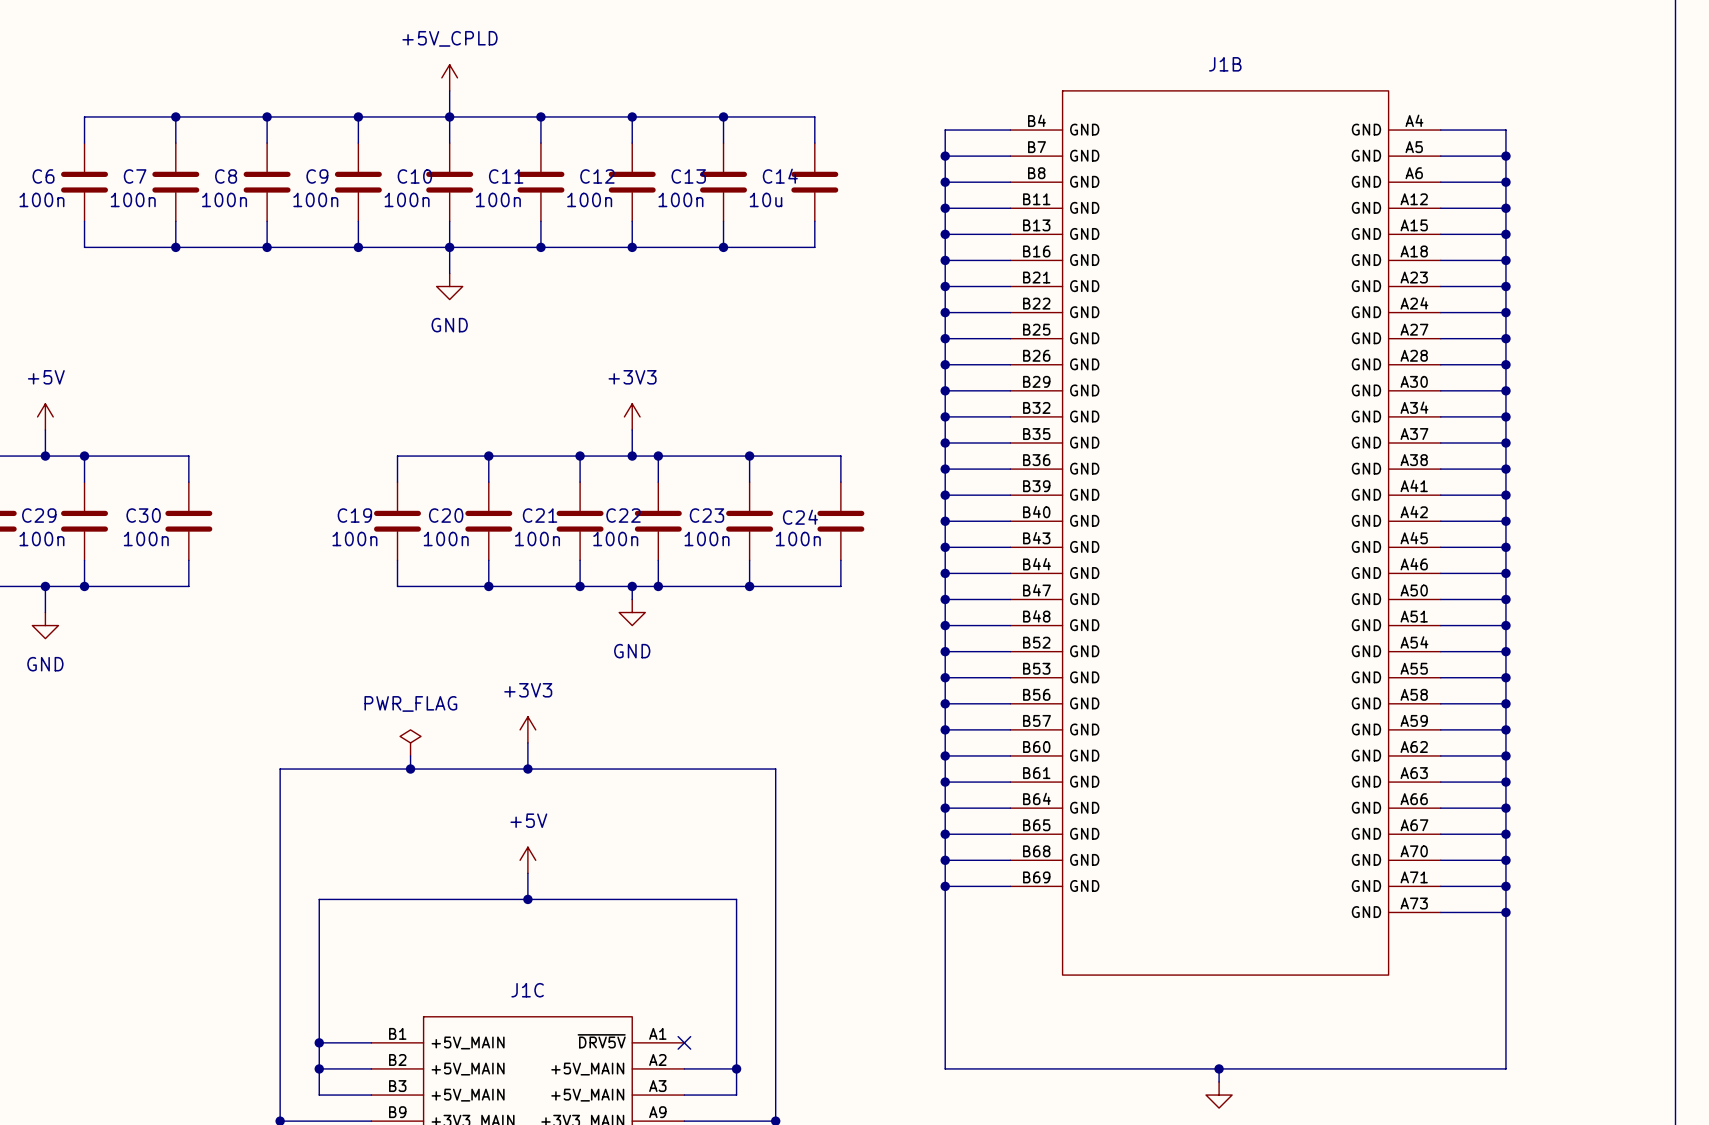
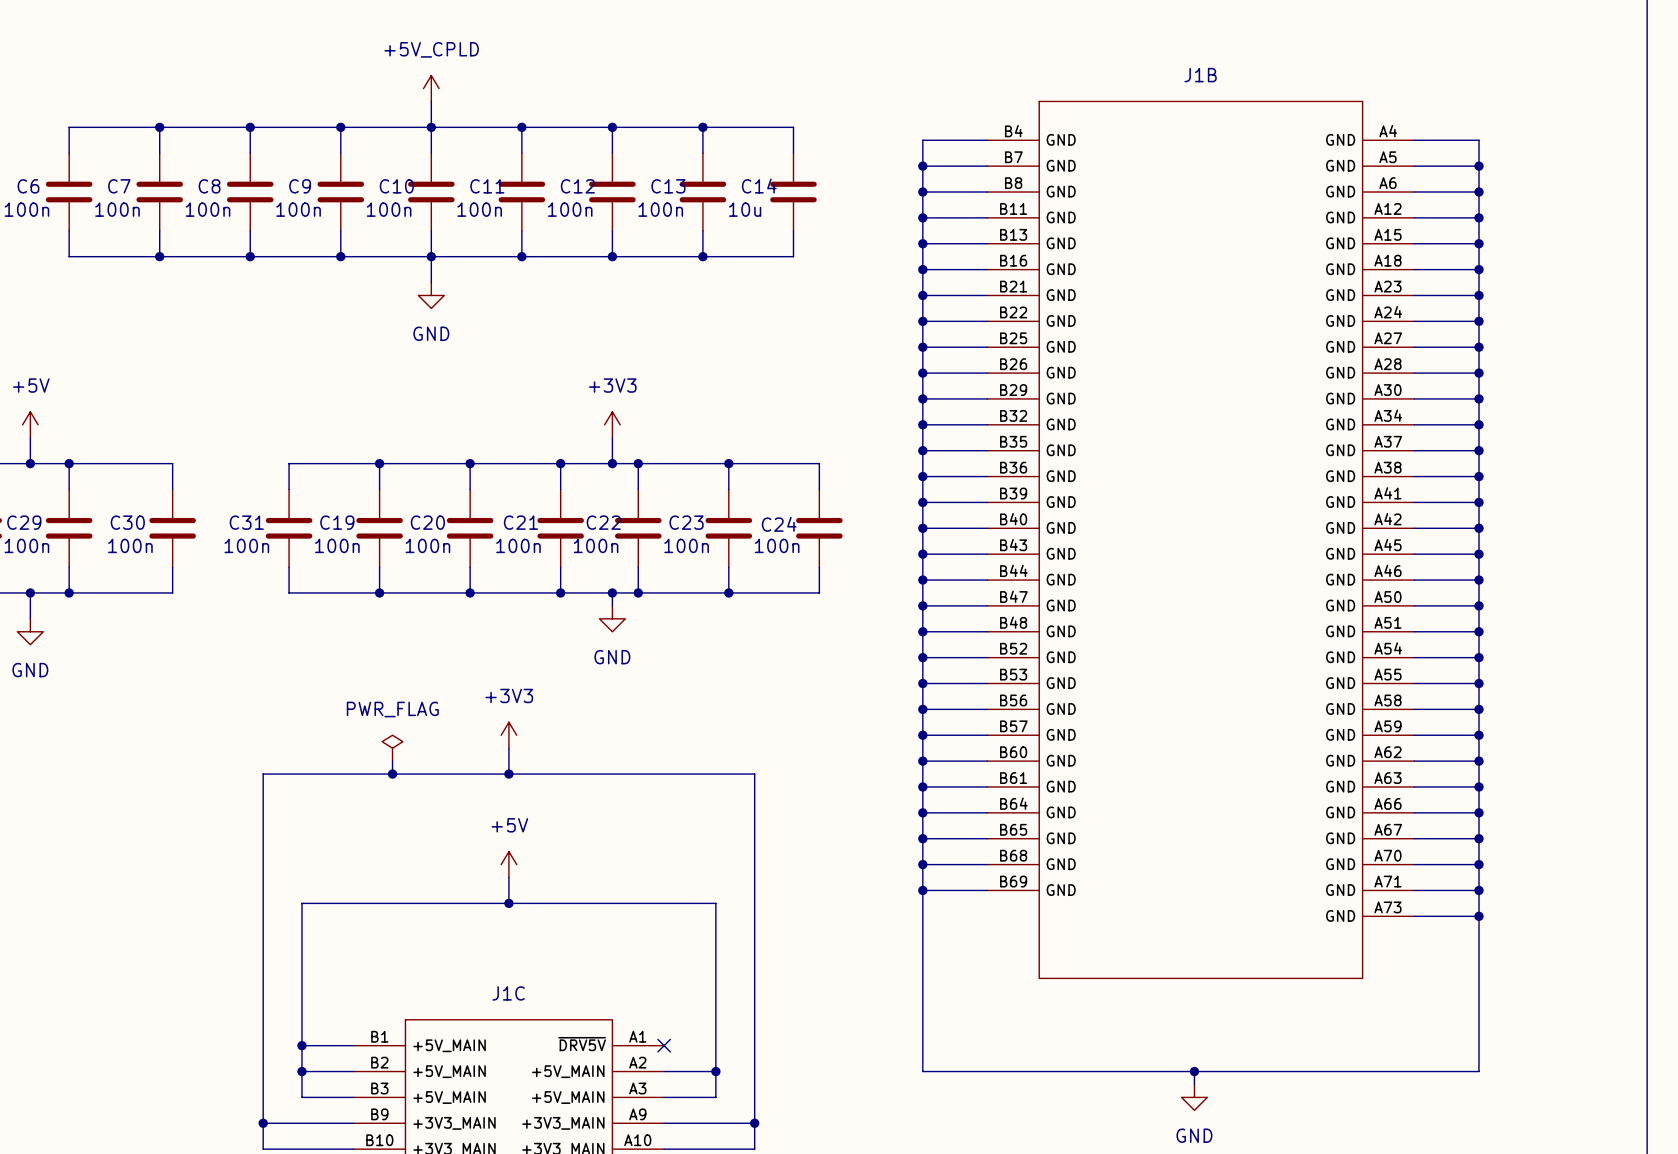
wire: none -> (379, 463) (289, 463) (289, 489)
junction: none -> (379, 463)
C31: none -> 100n (289, 528)
wire: none -> (289, 567) (289, 592) (379, 592)
junction: none -> (379, 592)

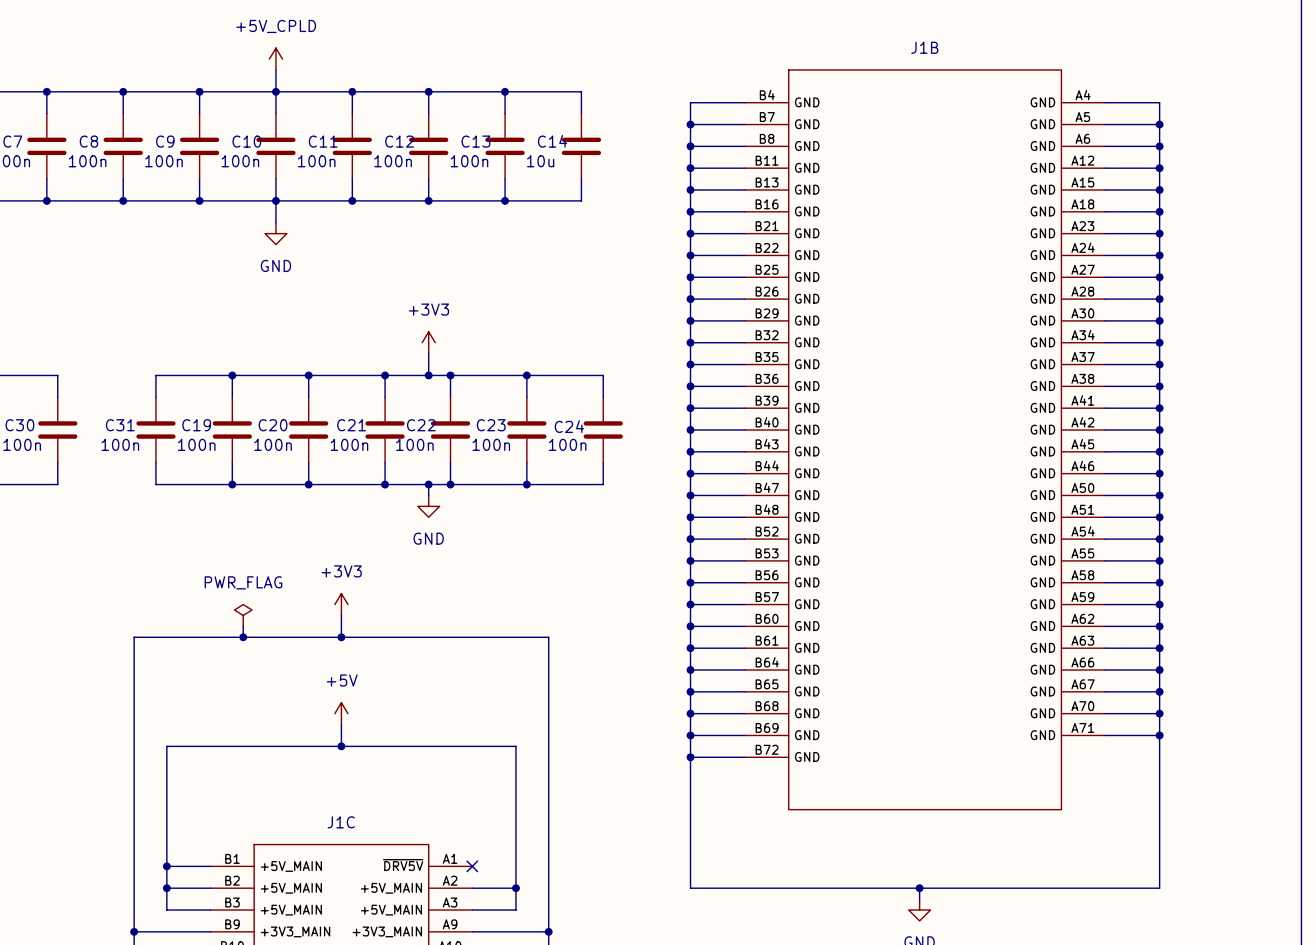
J1B symbol: [987, 101, 1415, 979] -> [745, 69, 1106, 810]
wire: none -> (690, 757) (745, 757)
junction: none -> (690, 757)
wire: (1414, 916) (1479, 916) -> none
junction: (1479, 916) -> none

